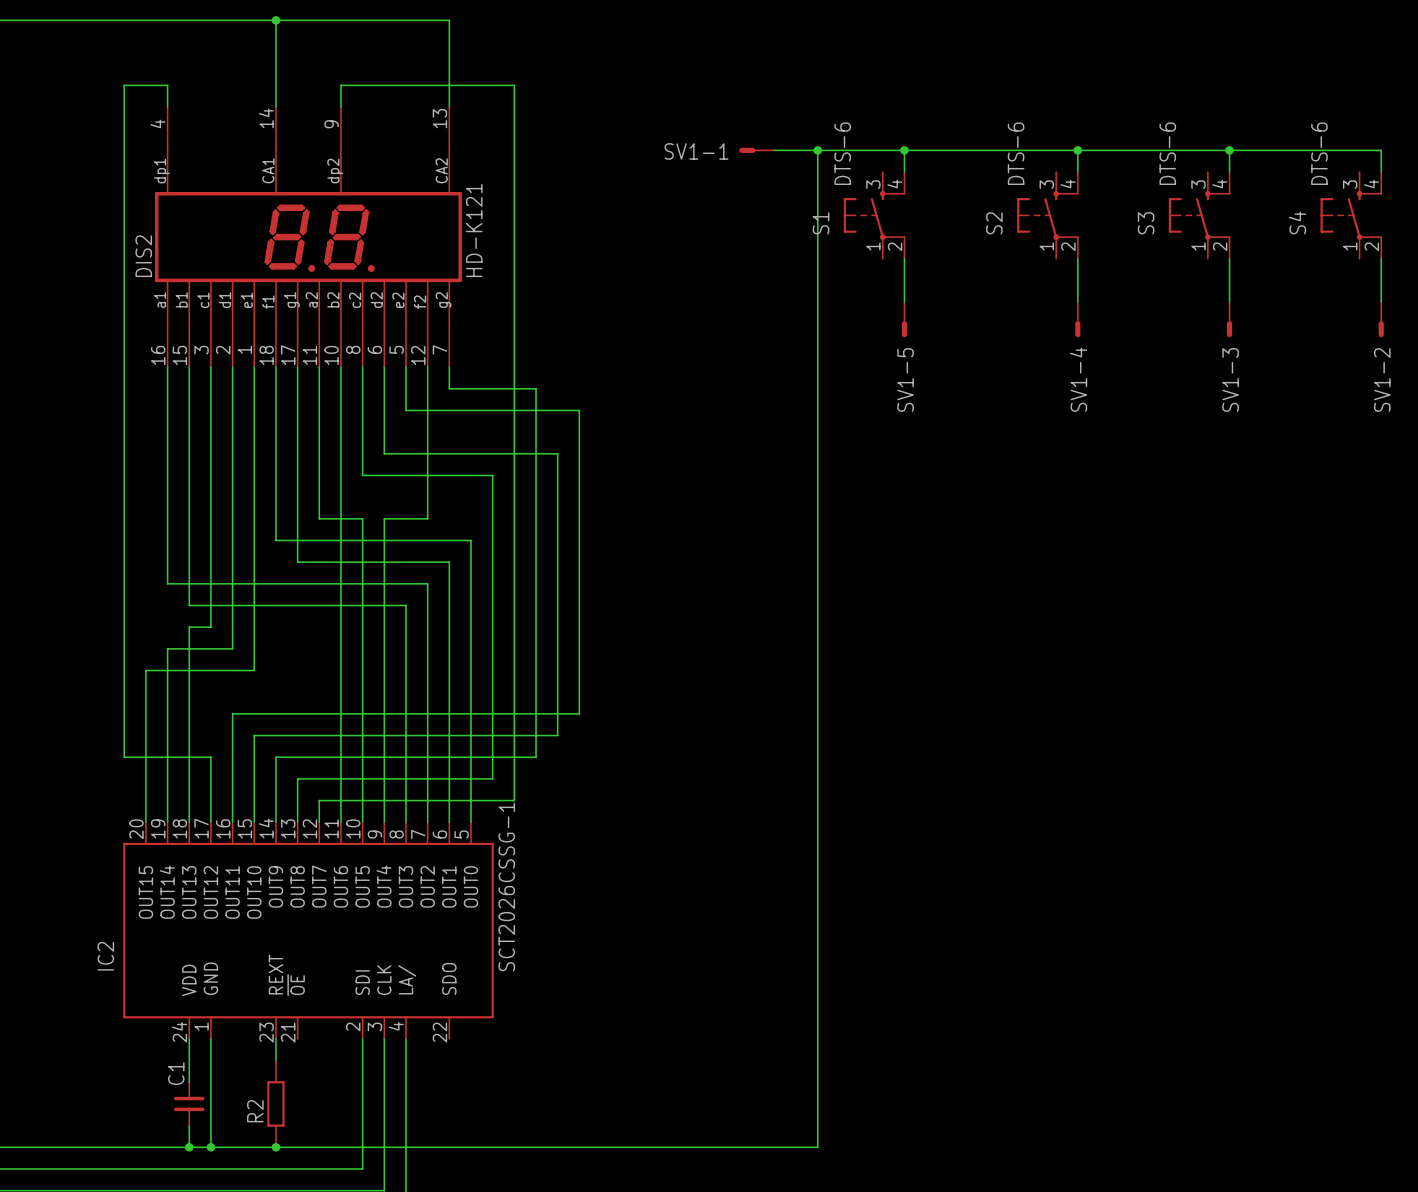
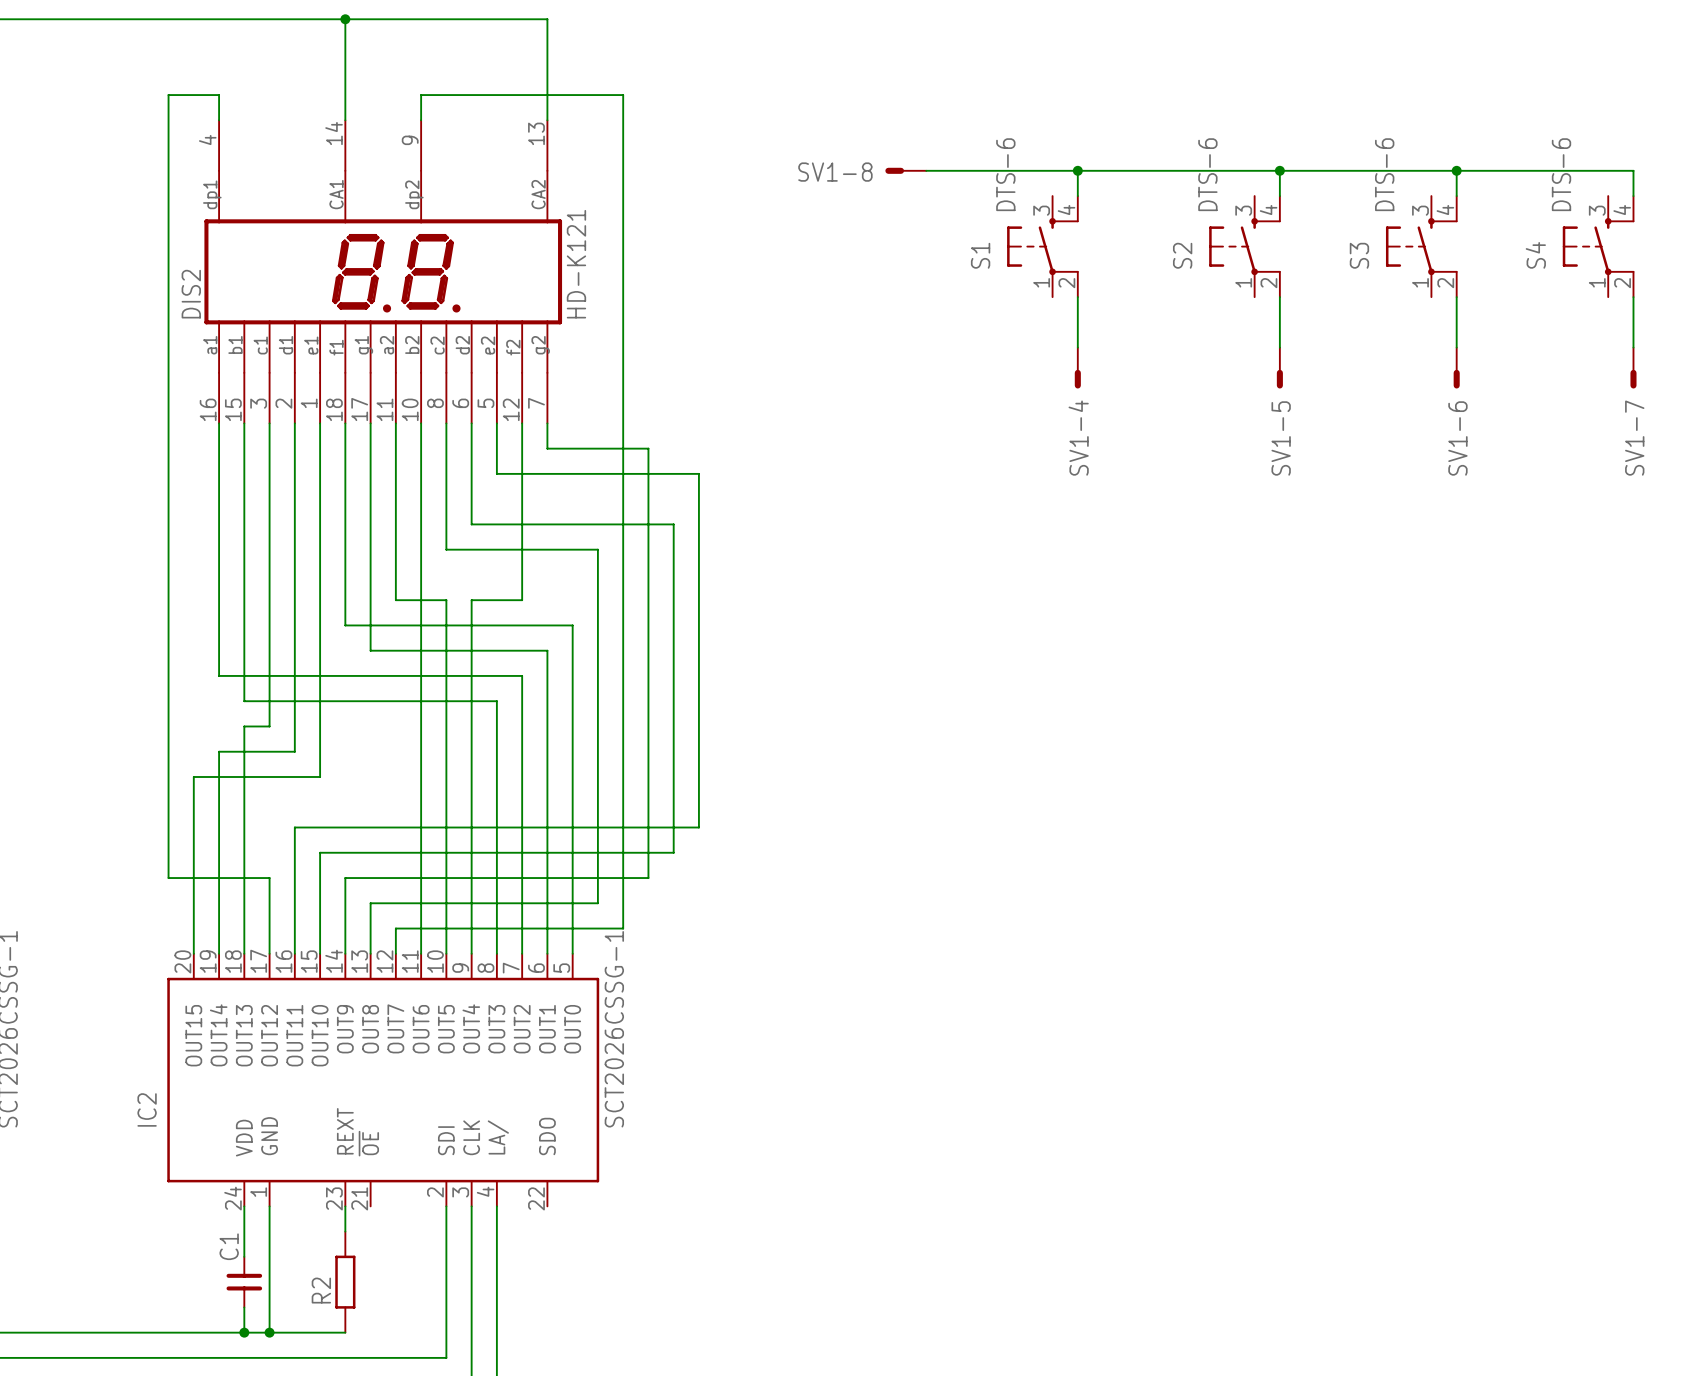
wire: (817, 150) (817, 1147) (275, 1147) -> none
junction: (817, 150) -> none
SV1-1 name: SV1-1 (696, 151) -> SV1-8 (835, 172)
SV1-4 name: SV1-4 (1078, 379) -> SV1-5 (1281, 438)
SV1-5 name: SV1-5 (905, 380) -> SV1-4 (1078, 438)
SV1-3 name: SV1-3 (1230, 380) -> SV1-6 (1457, 438)
SV1-2 name: SV1-2 (1382, 380) -> SV1-7 (1634, 438)
junction: (275, 1147) -> none

